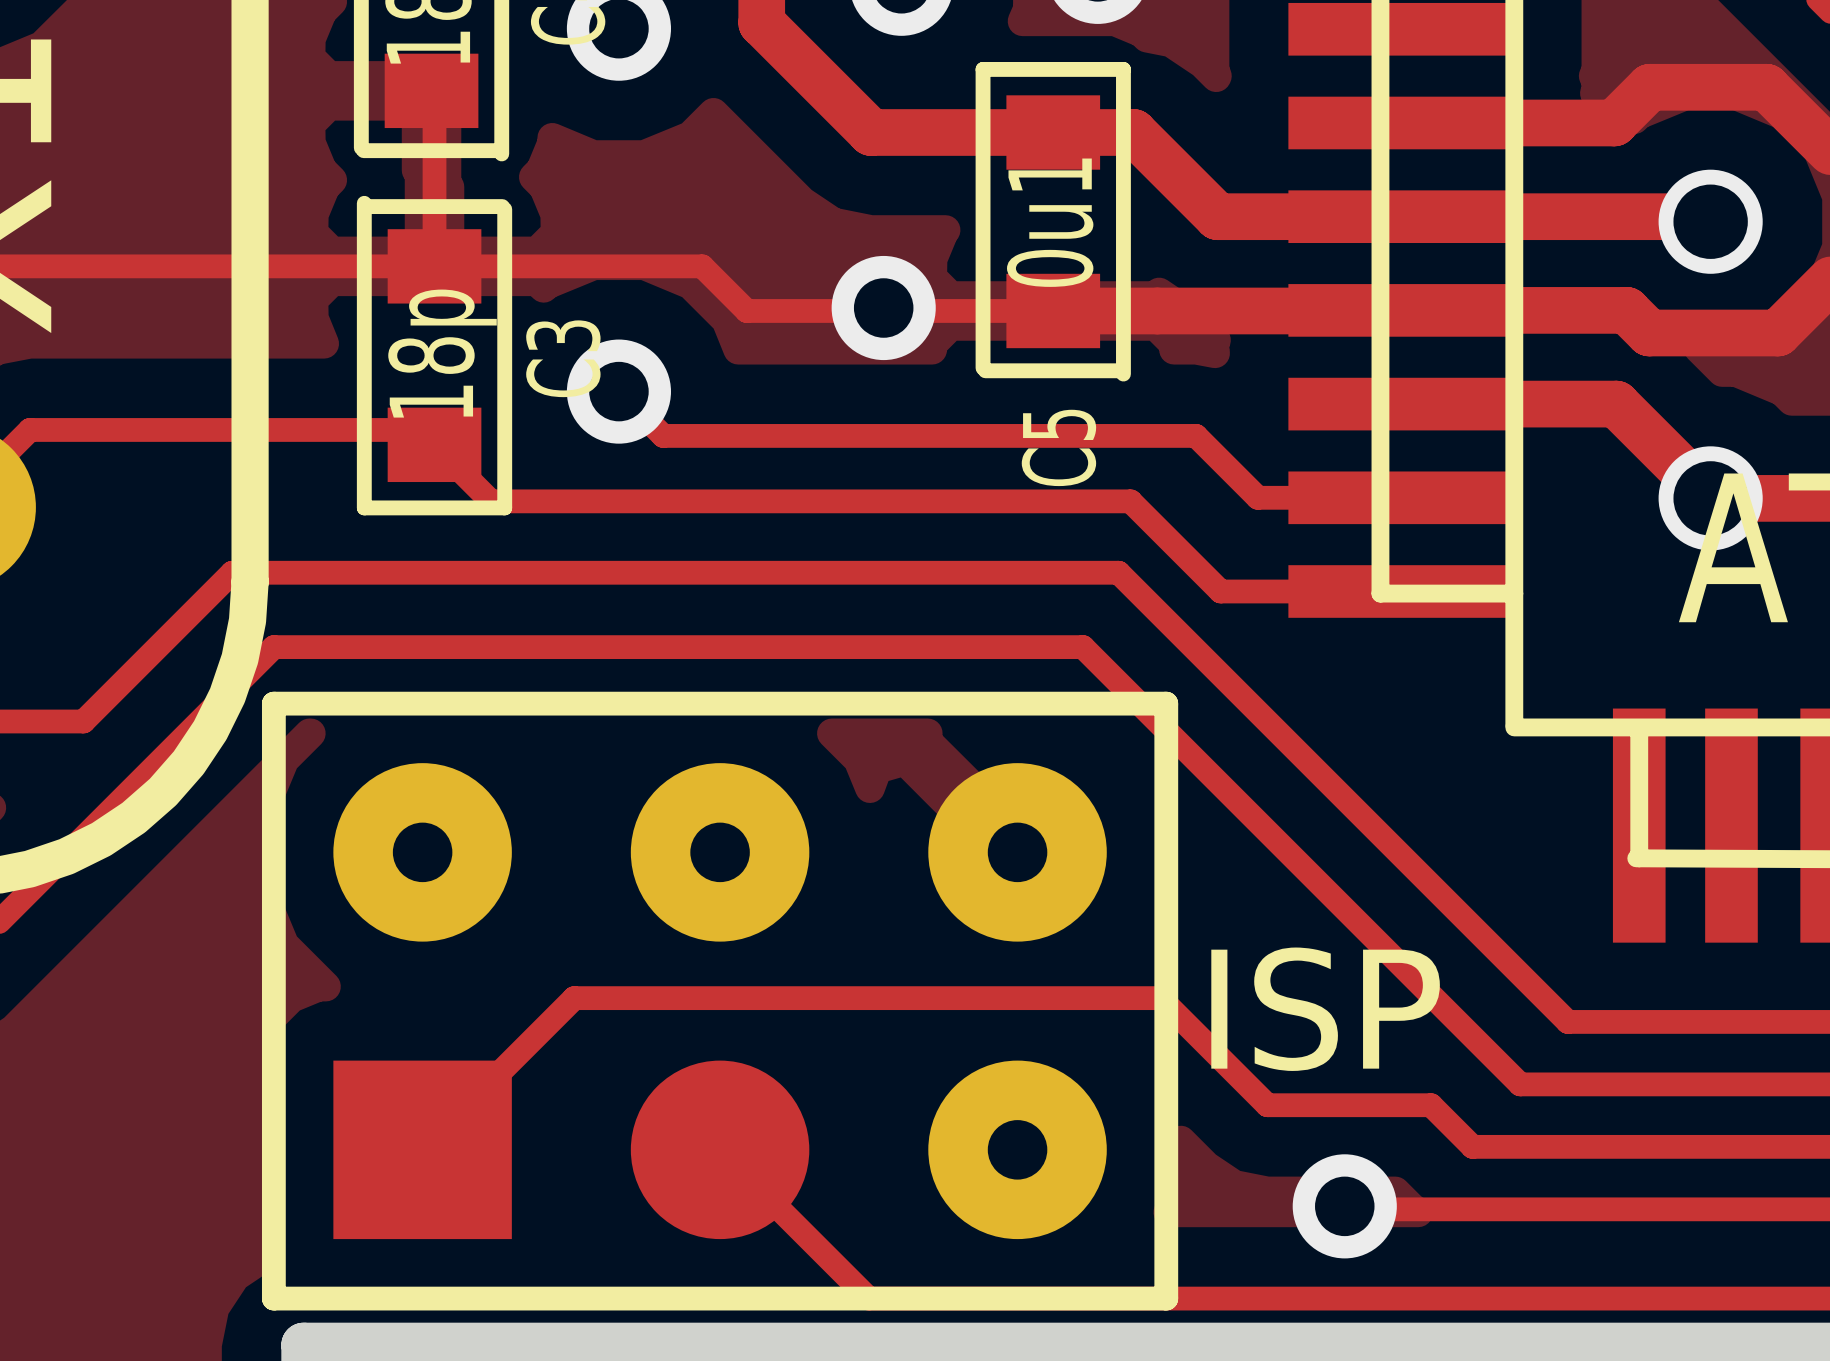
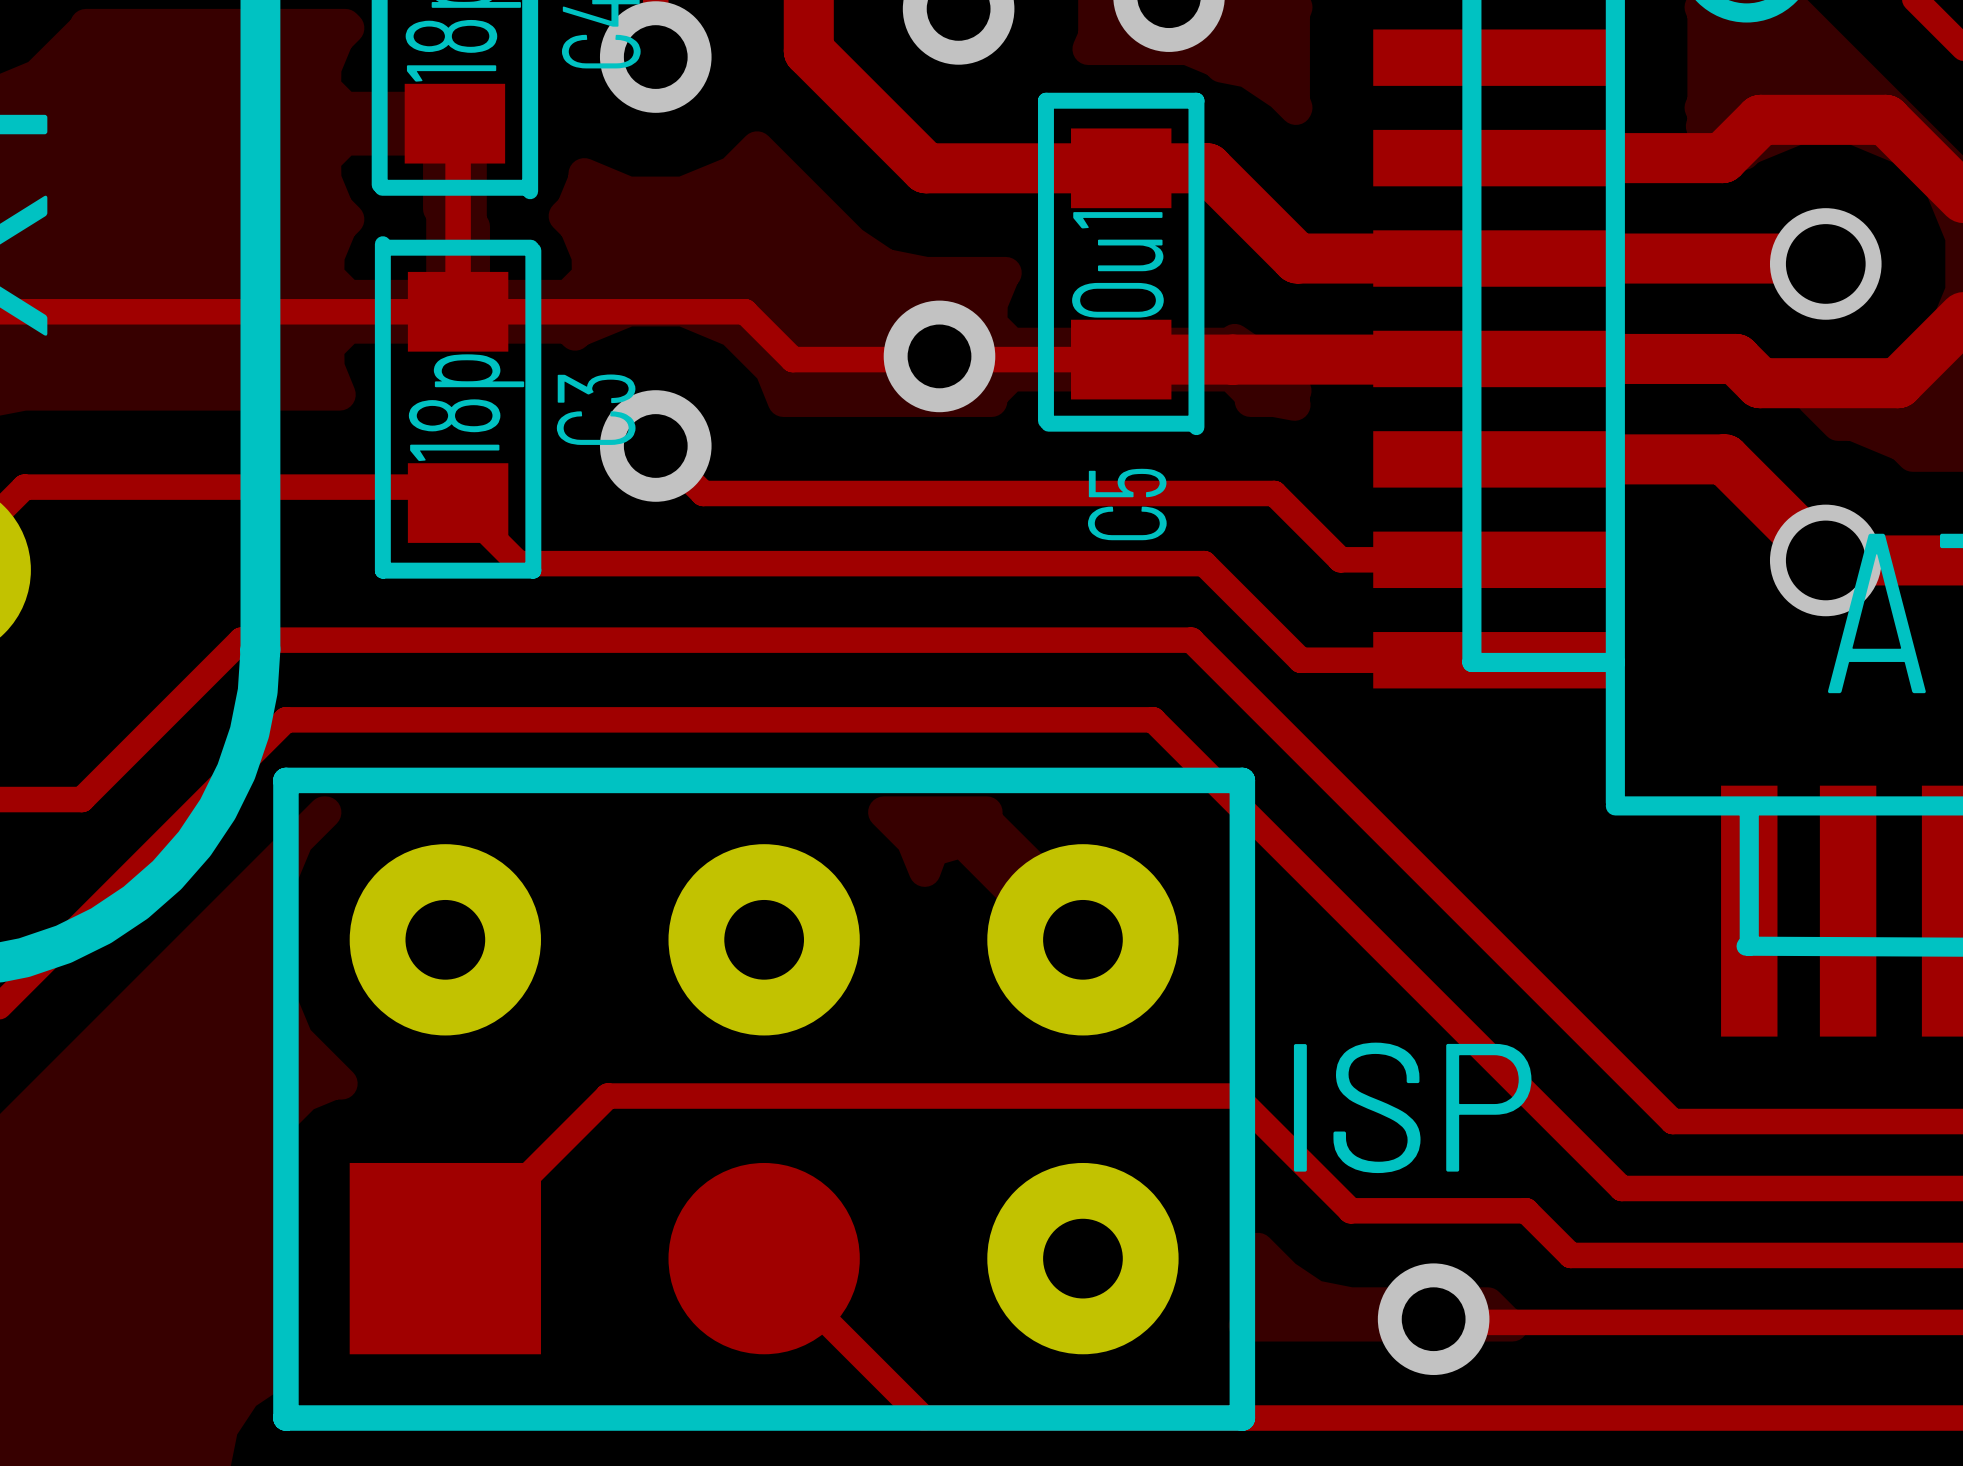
part footprint: [261, 691, 1179, 1311] -> [273, 767, 1256, 1431]

